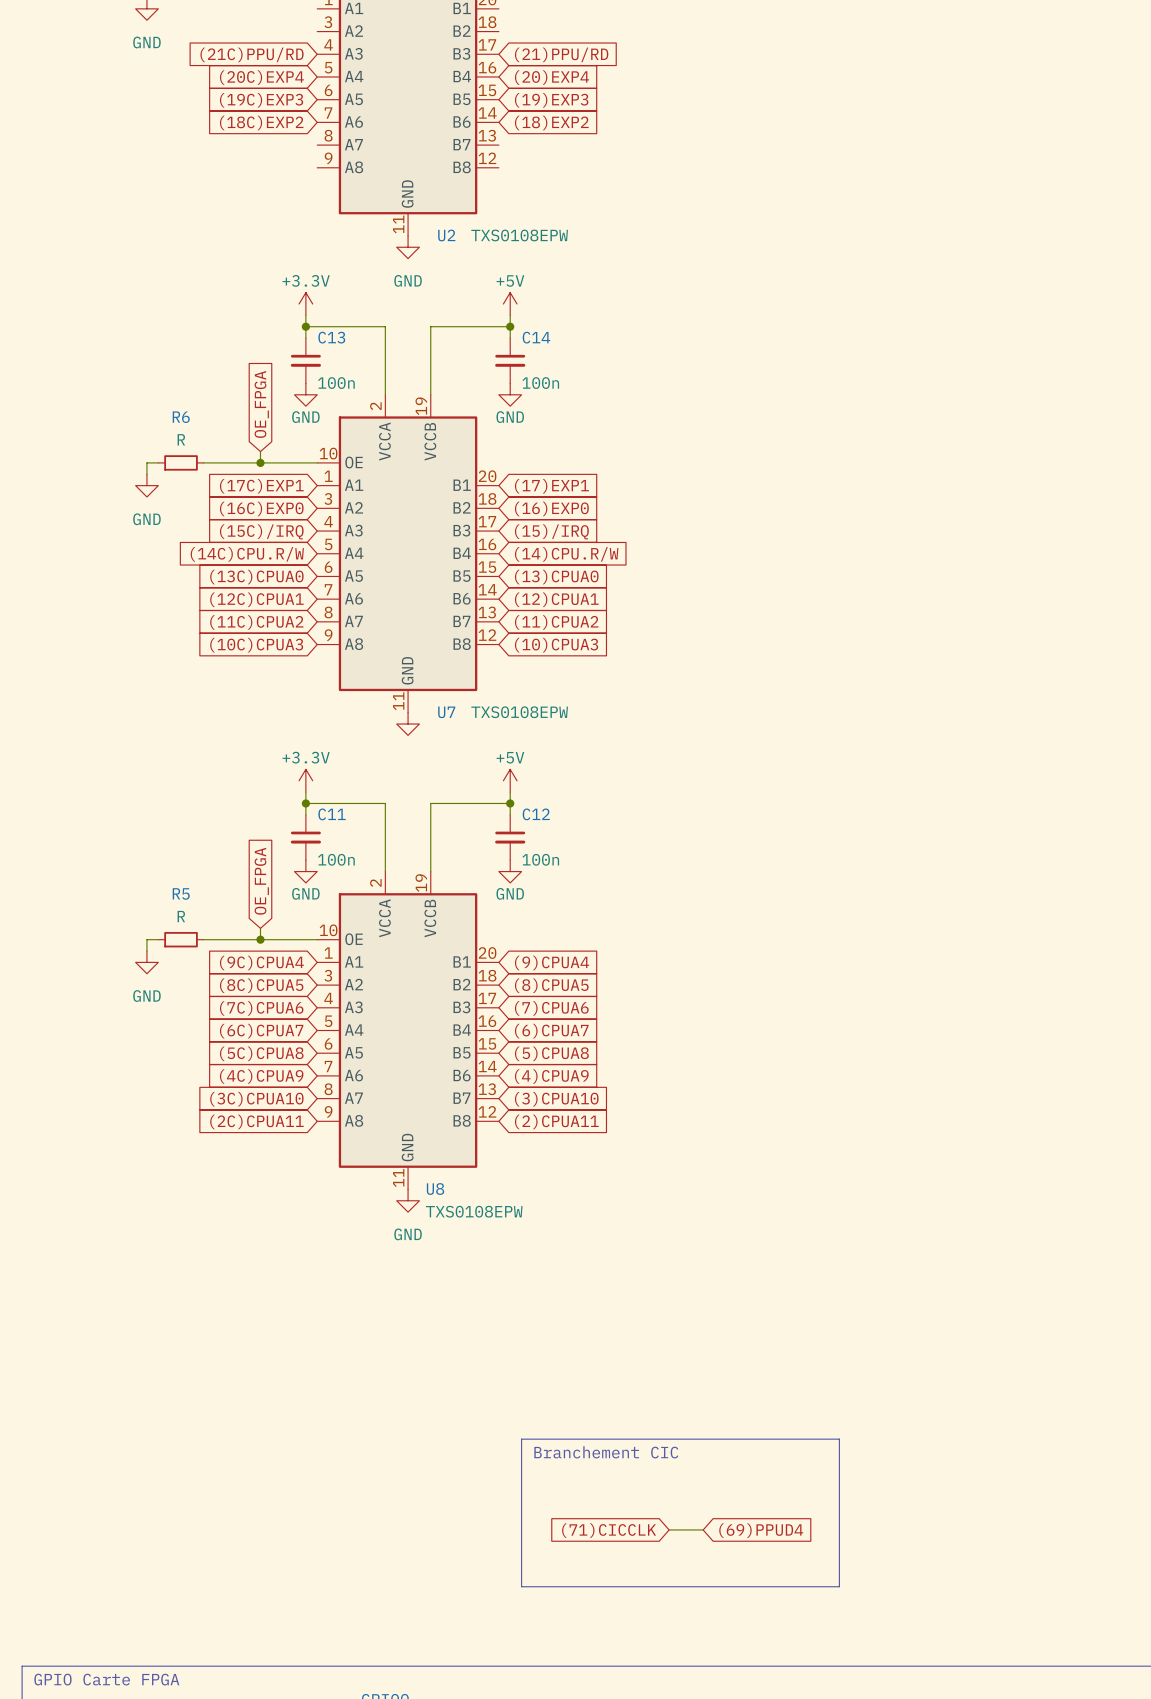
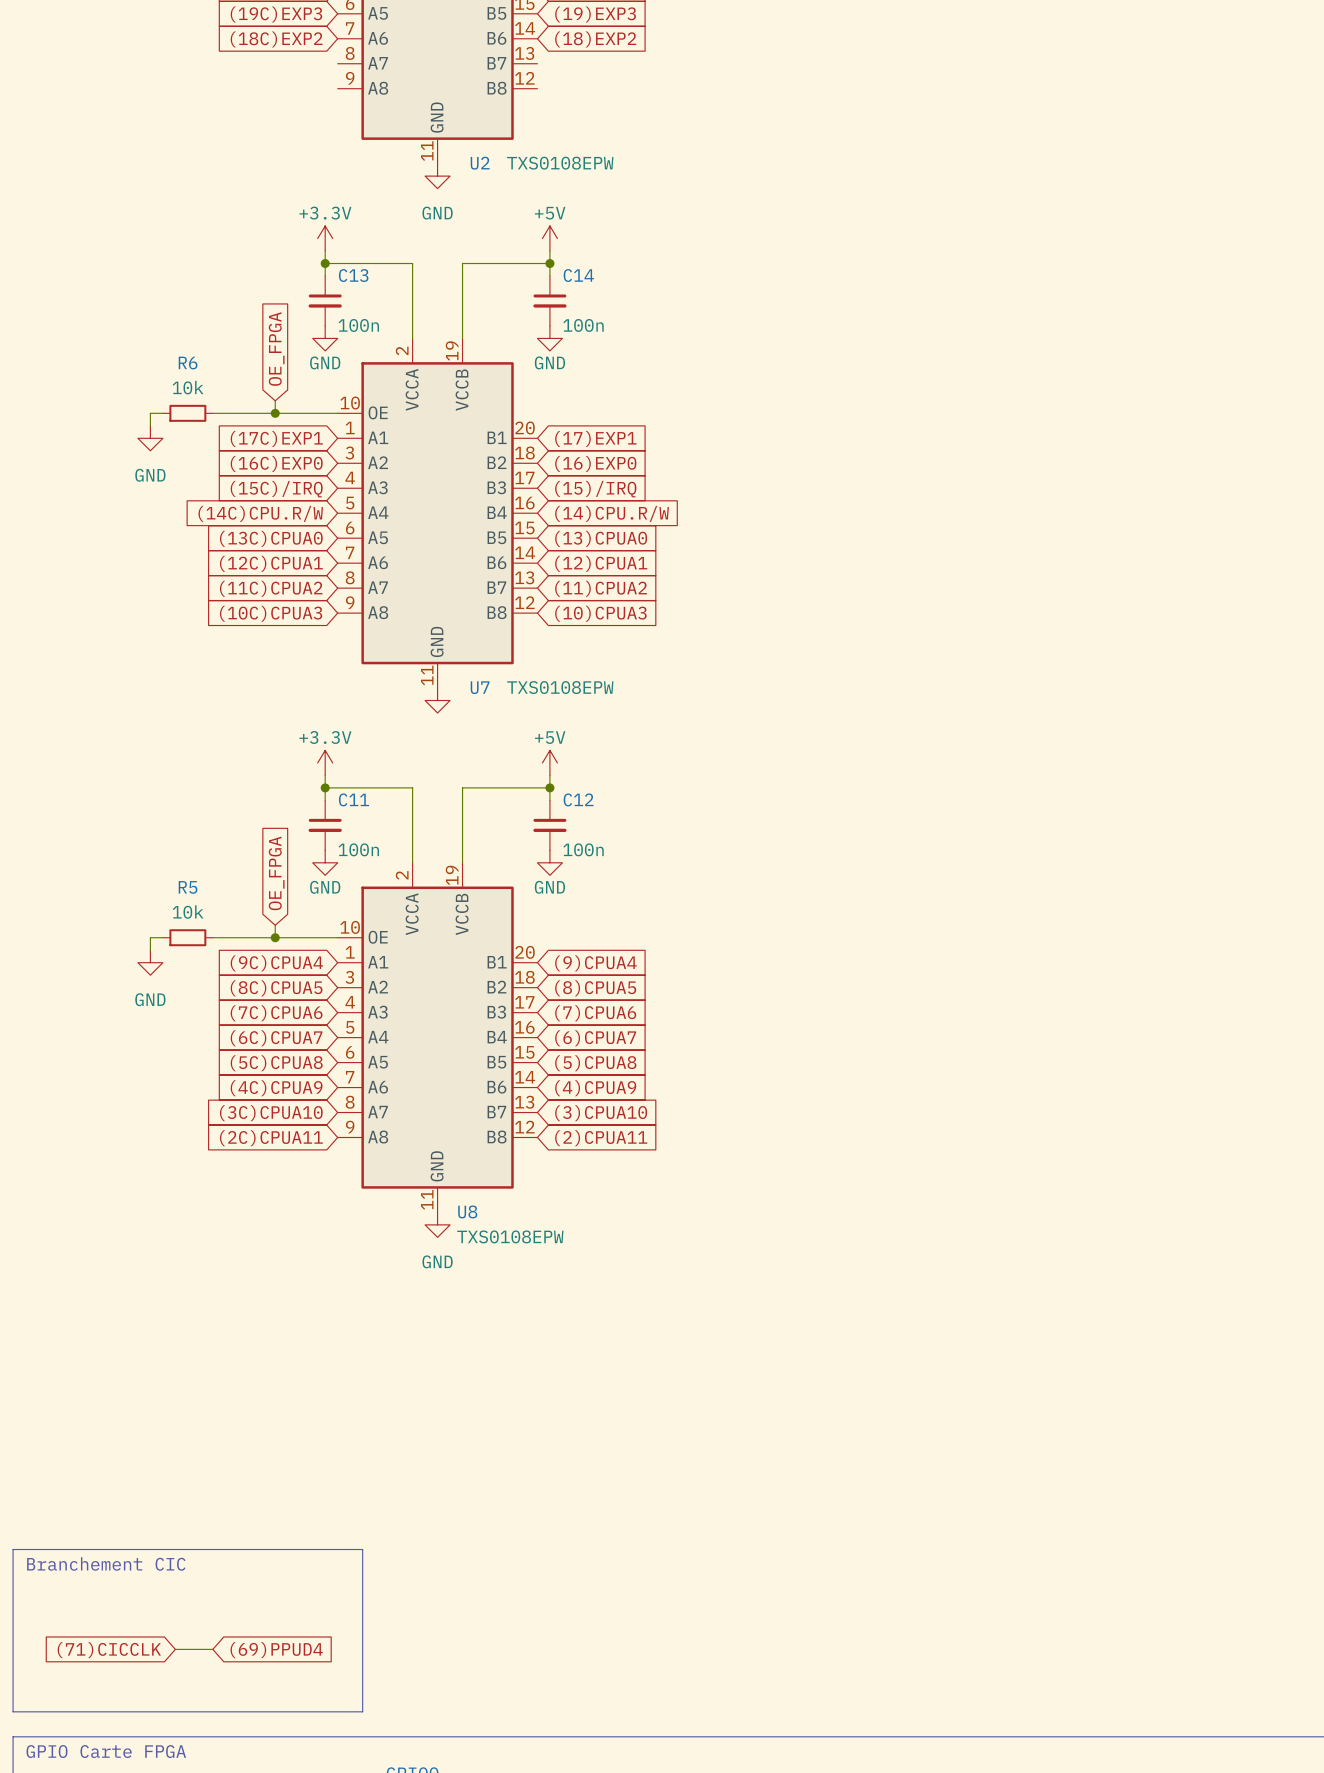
R6 value: R (181, 439) -> 10k (188, 387)
R5 value: R (181, 916) -> 10k (188, 912)
line: (521, 1439) (521, 1586) (839, 1586) (839, 1439) (521, 1439) -> none
text: Branchement CIC (606, 1452) -> none
line: none -> (13, 1549) (13, 1711) (362, 1711) (362, 1549) (13, 1549)
text: none -> Branchement CIC (106, 1563)
wire: (669, 1529) (703, 1529) -> none
global label: (71)CICCLK (609, 1530) -> none
global label: (69)PPUD4 (761, 1530) -> none
wire: none -> (175, 1649) (212, 1649)
global label: none -> (71)CICCLK (109, 1650)
global label: none -> (69)PPUD4 (276, 1650)

